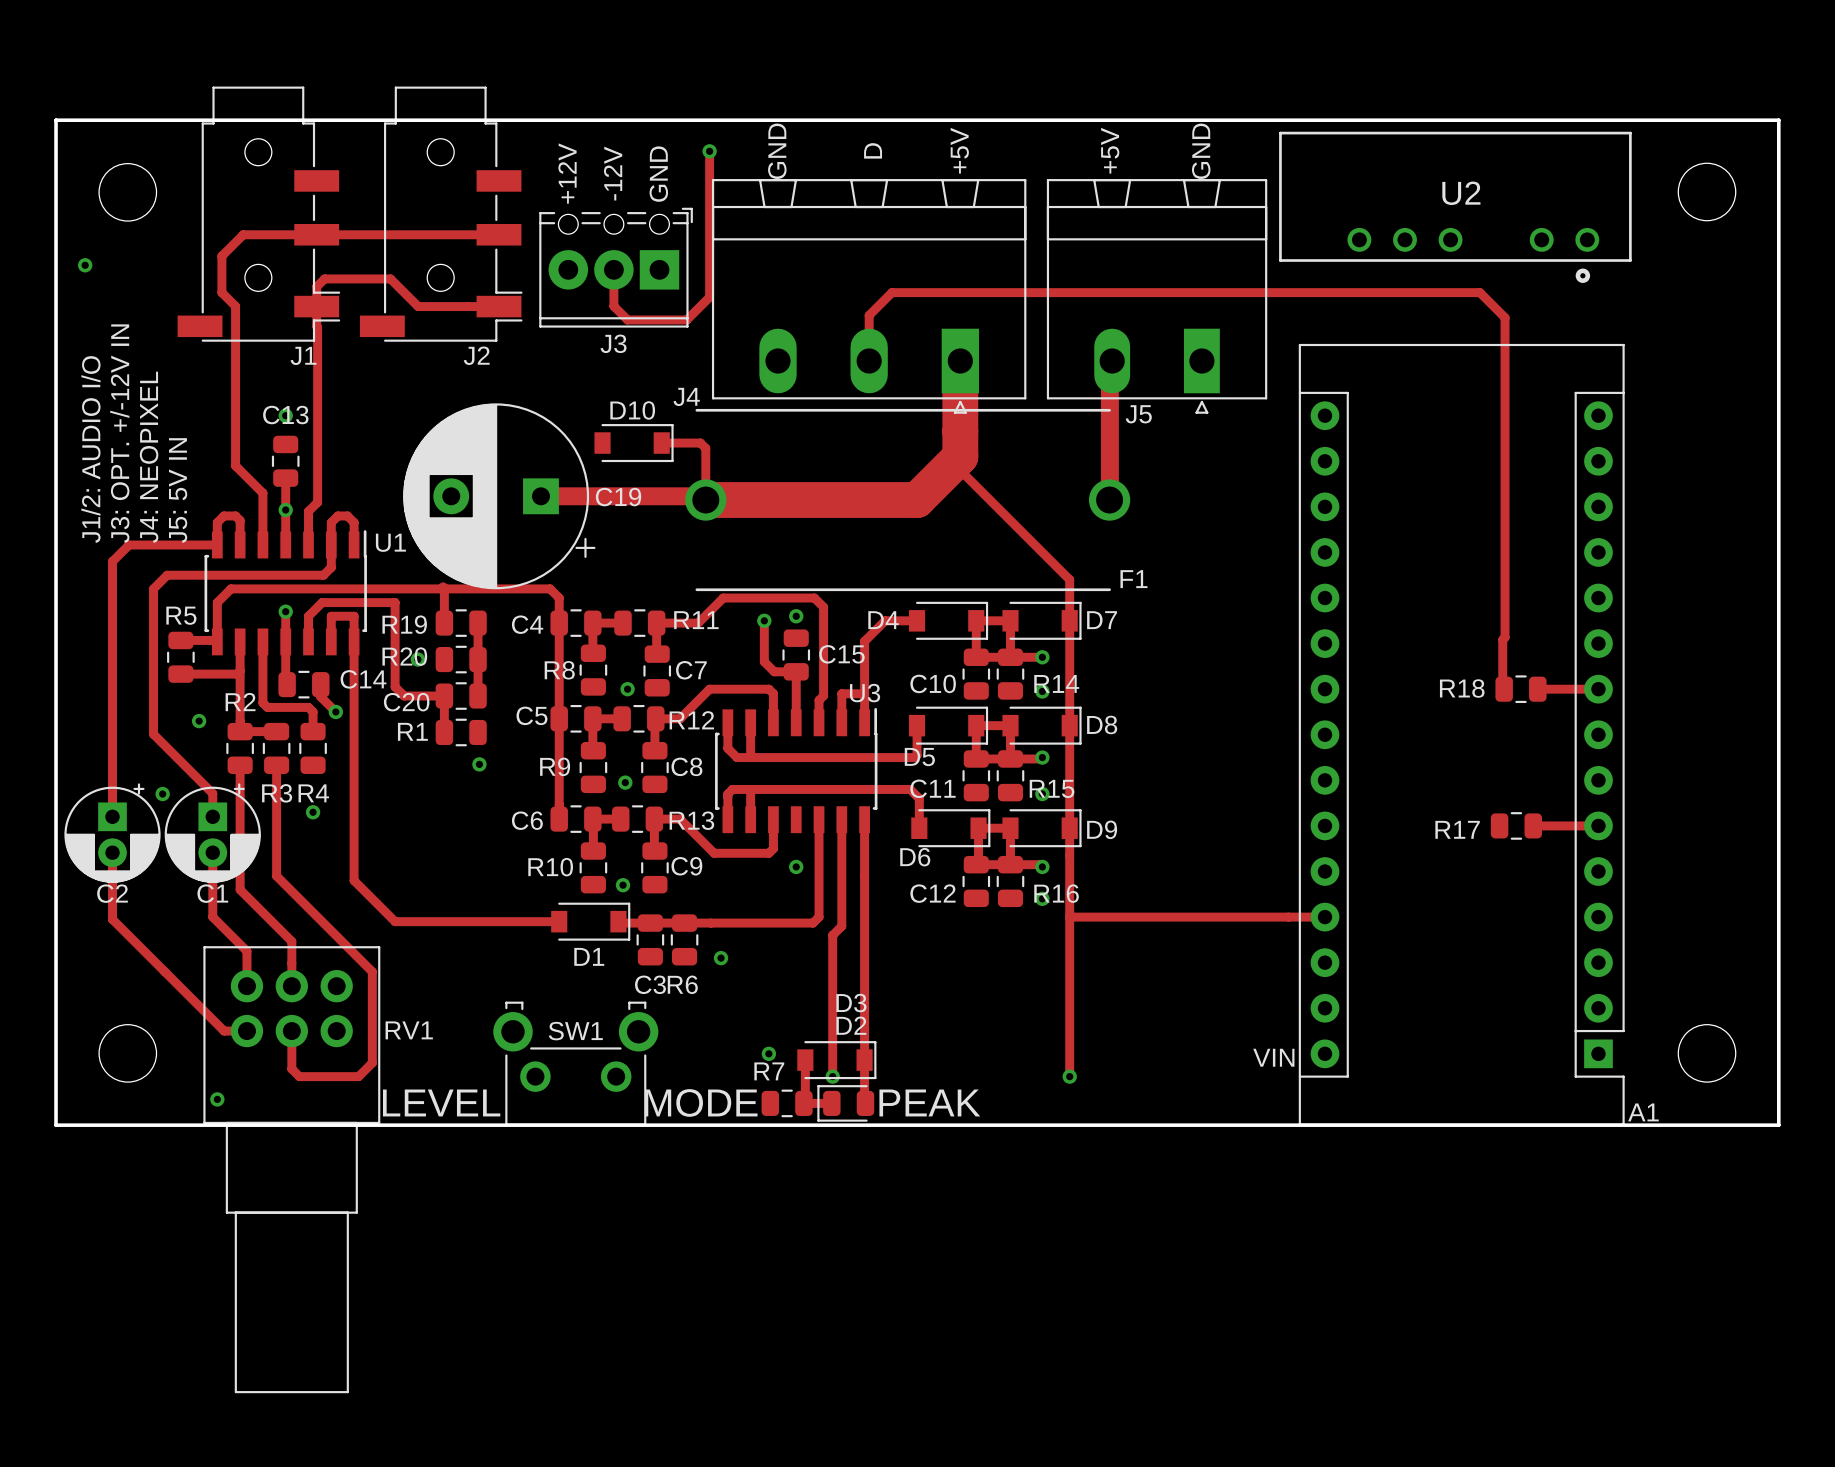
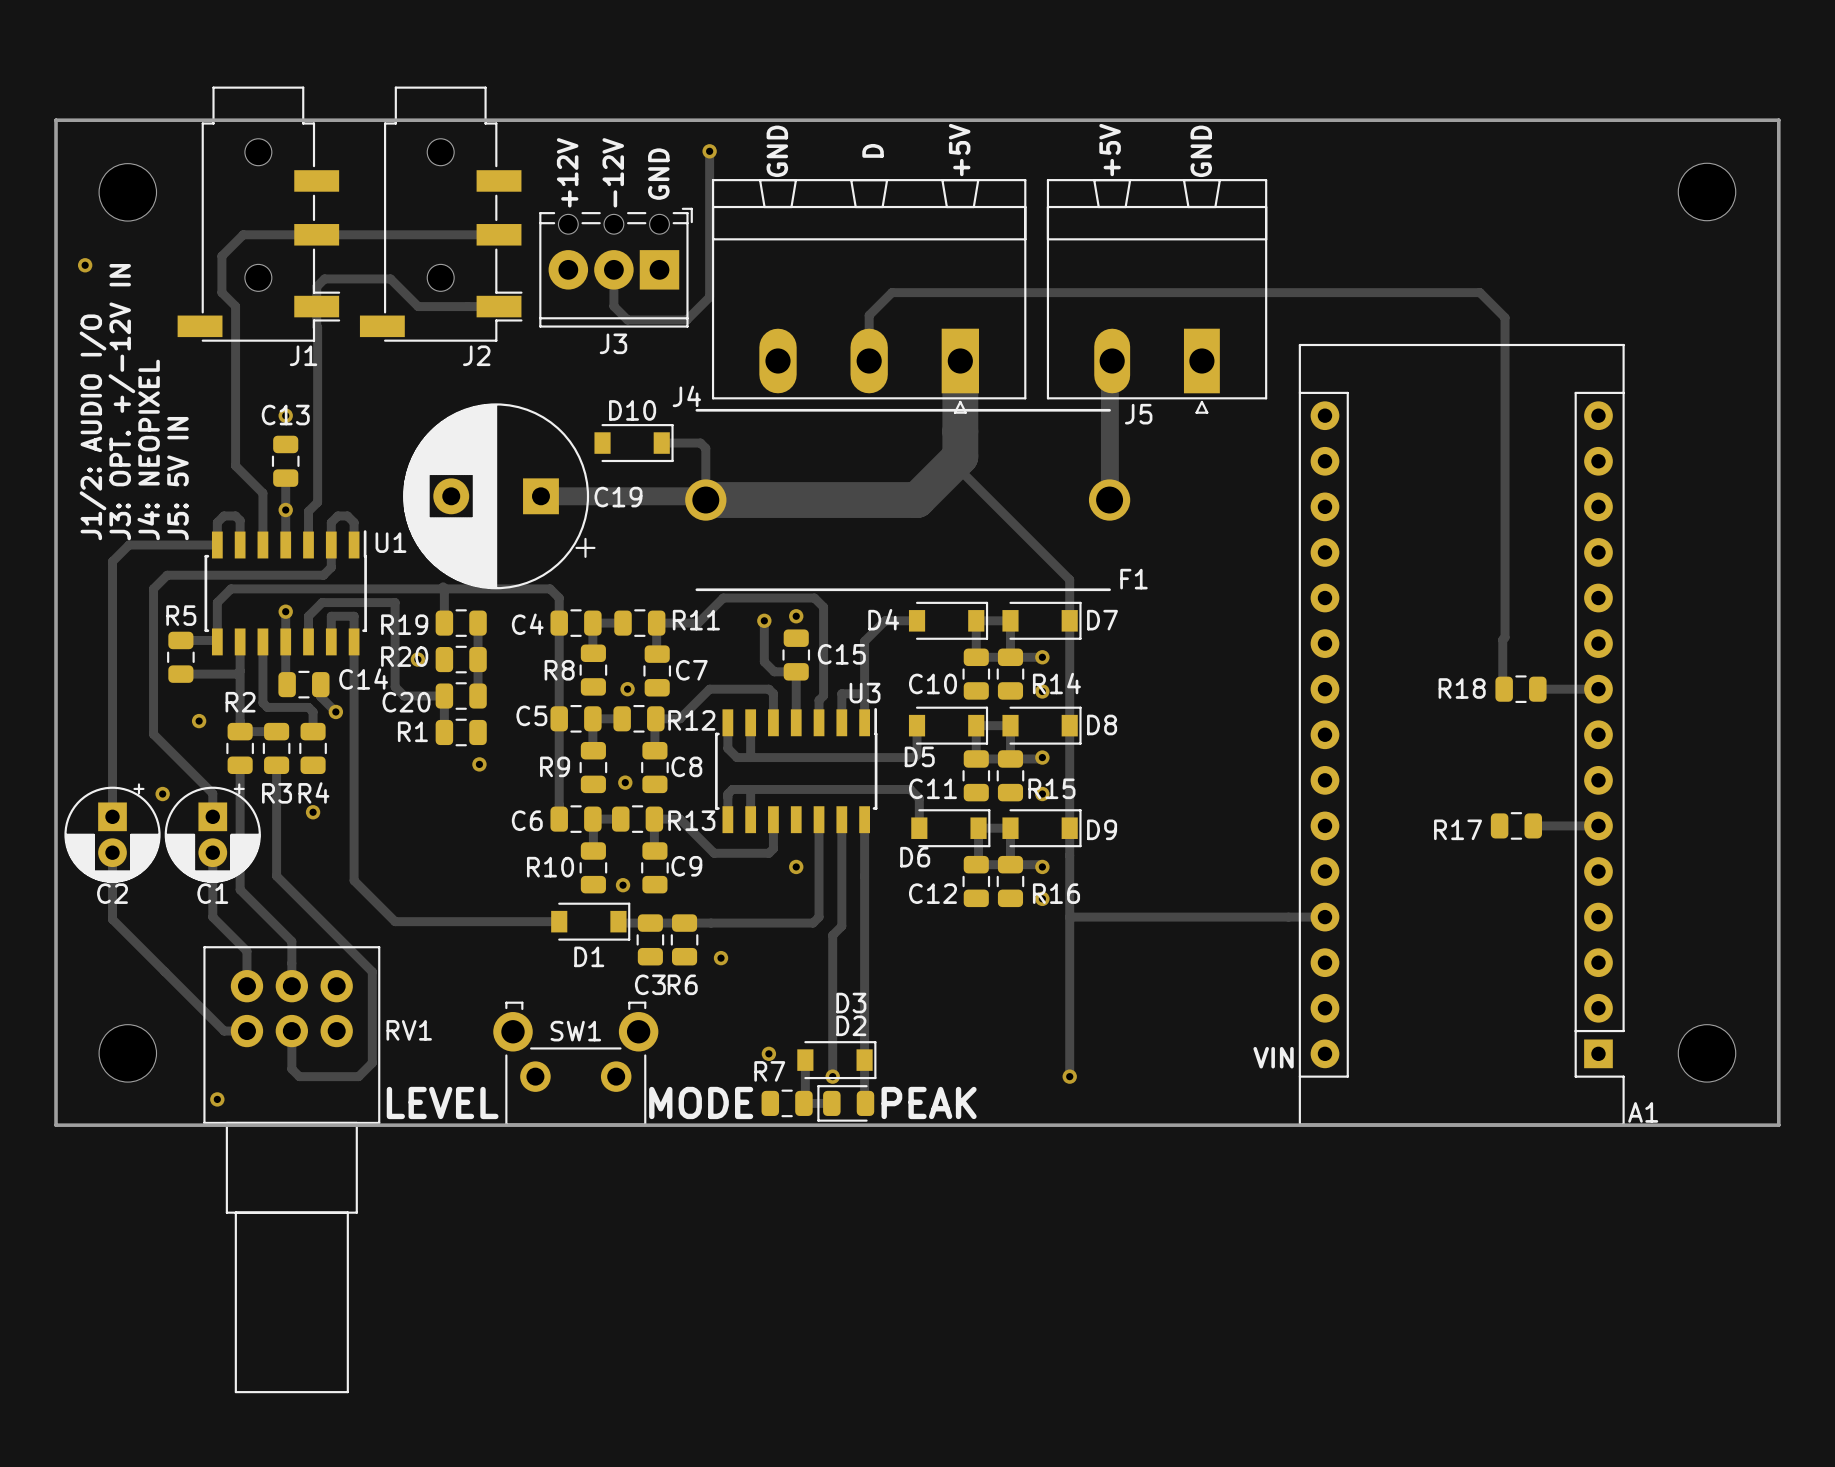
U2: (1455, 207) -> none

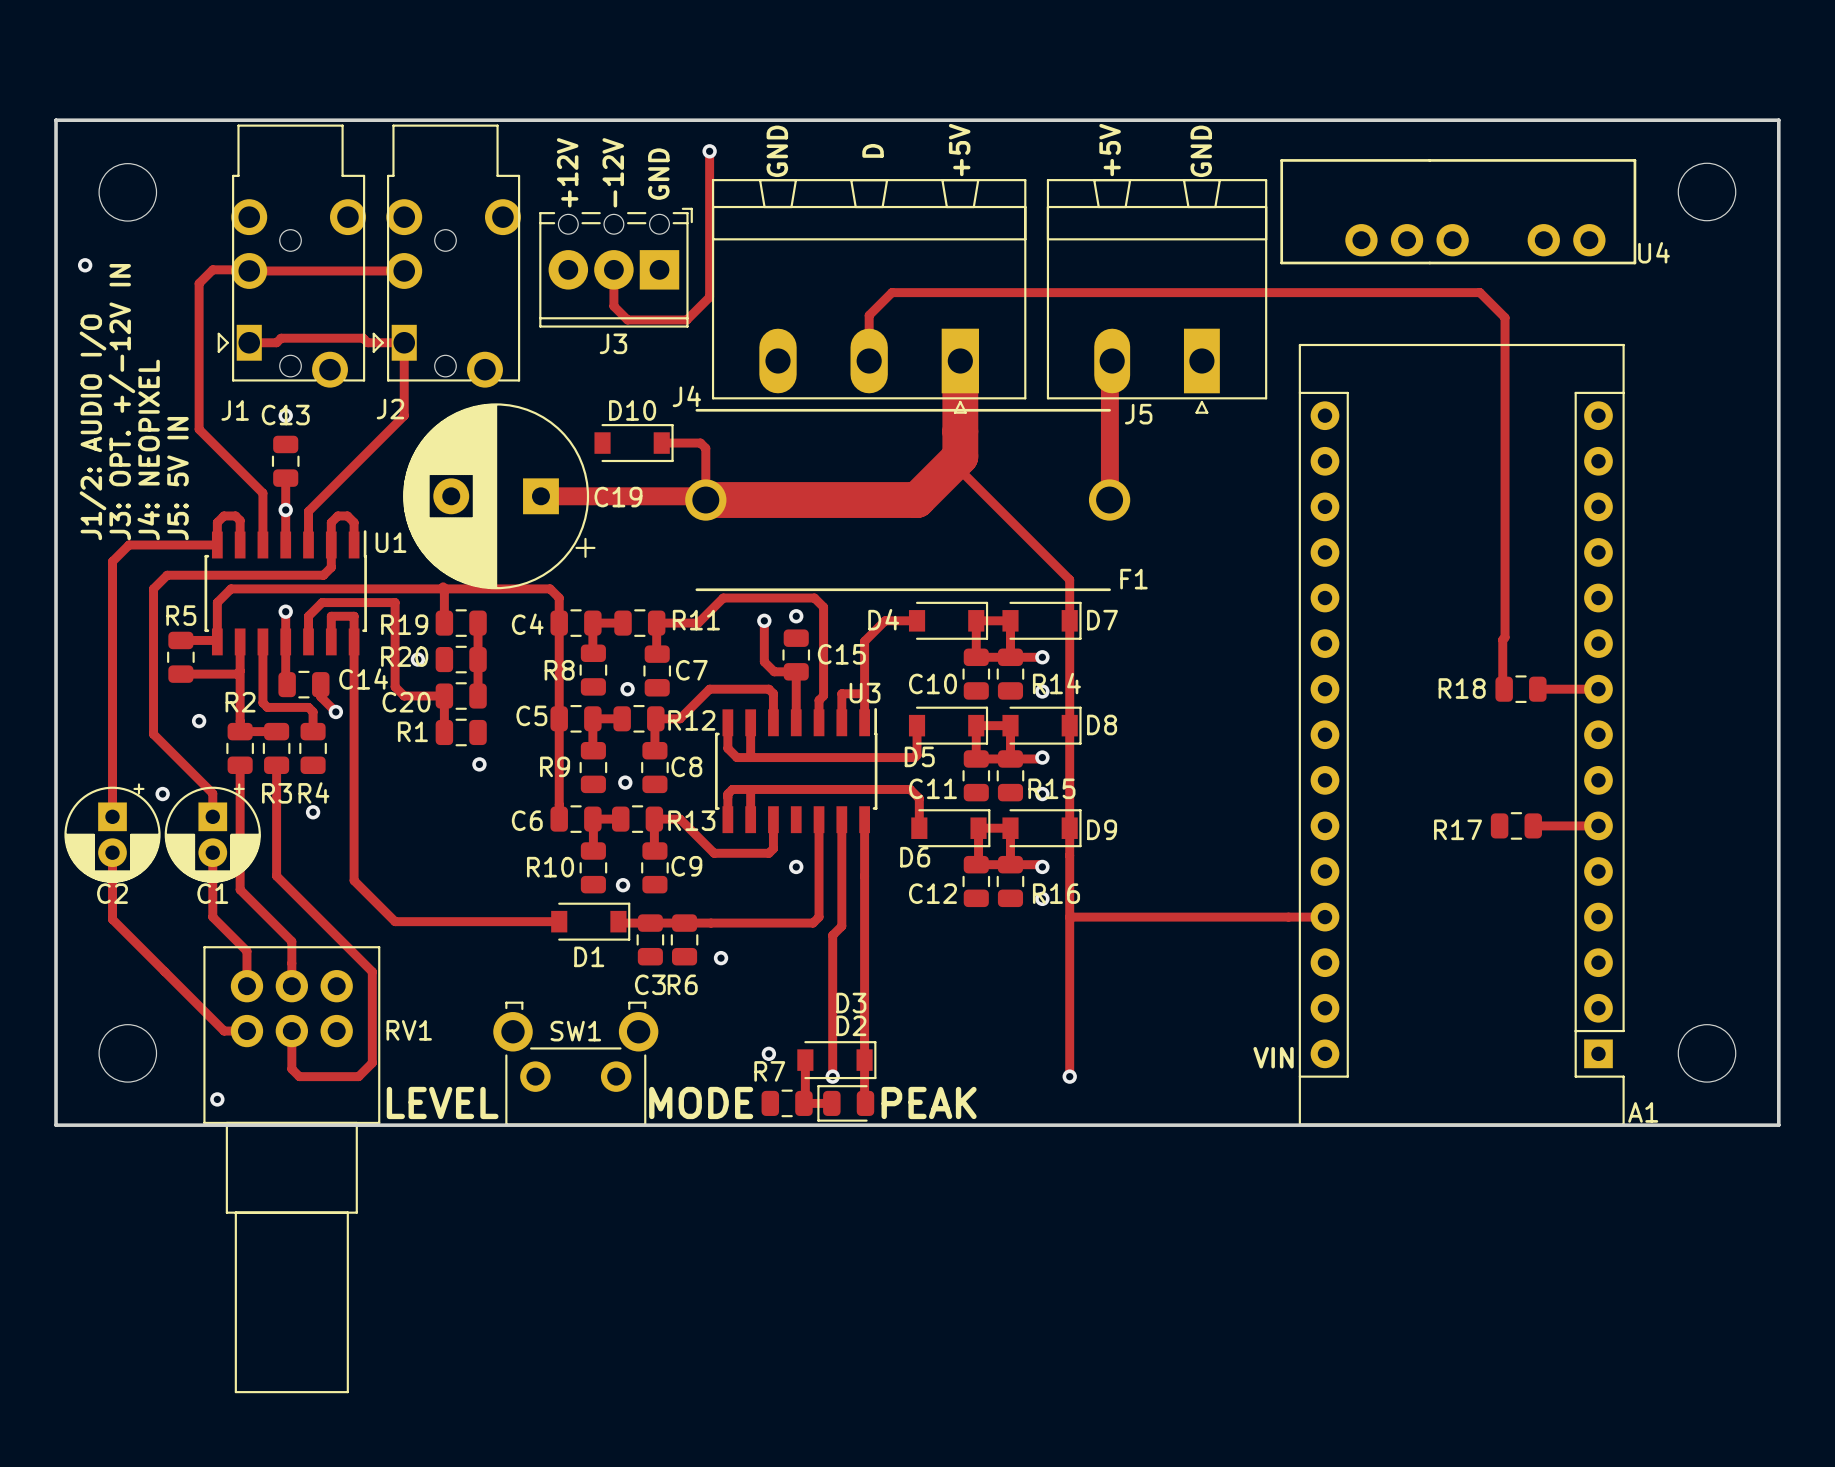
J1 footprint: [177, 86, 341, 342] -> [217, 124, 366, 388]
J2 footprint: [359, 86, 523, 342] -> [372, 124, 521, 388]
U4: none -> (1458, 211)
track: (499, 234) (243, 234) (221, 256) (221, 292) (235, 306) (235, 465) -> (404, 270) (212, 269) (199, 283) (199, 429) (235, 465)
track: (499, 306) (418, 306) (390, 278) (324, 278) (316, 286) (317, 502) -> (249, 342) (276, 342) (281, 338) (363, 338) (367, 342) (404, 342) (404, 415) (317, 502)
J1 name position: J1 (303, 355) -> J1 (235, 410)
J2 name position: J2 (476, 355) -> J2 (390, 409)

